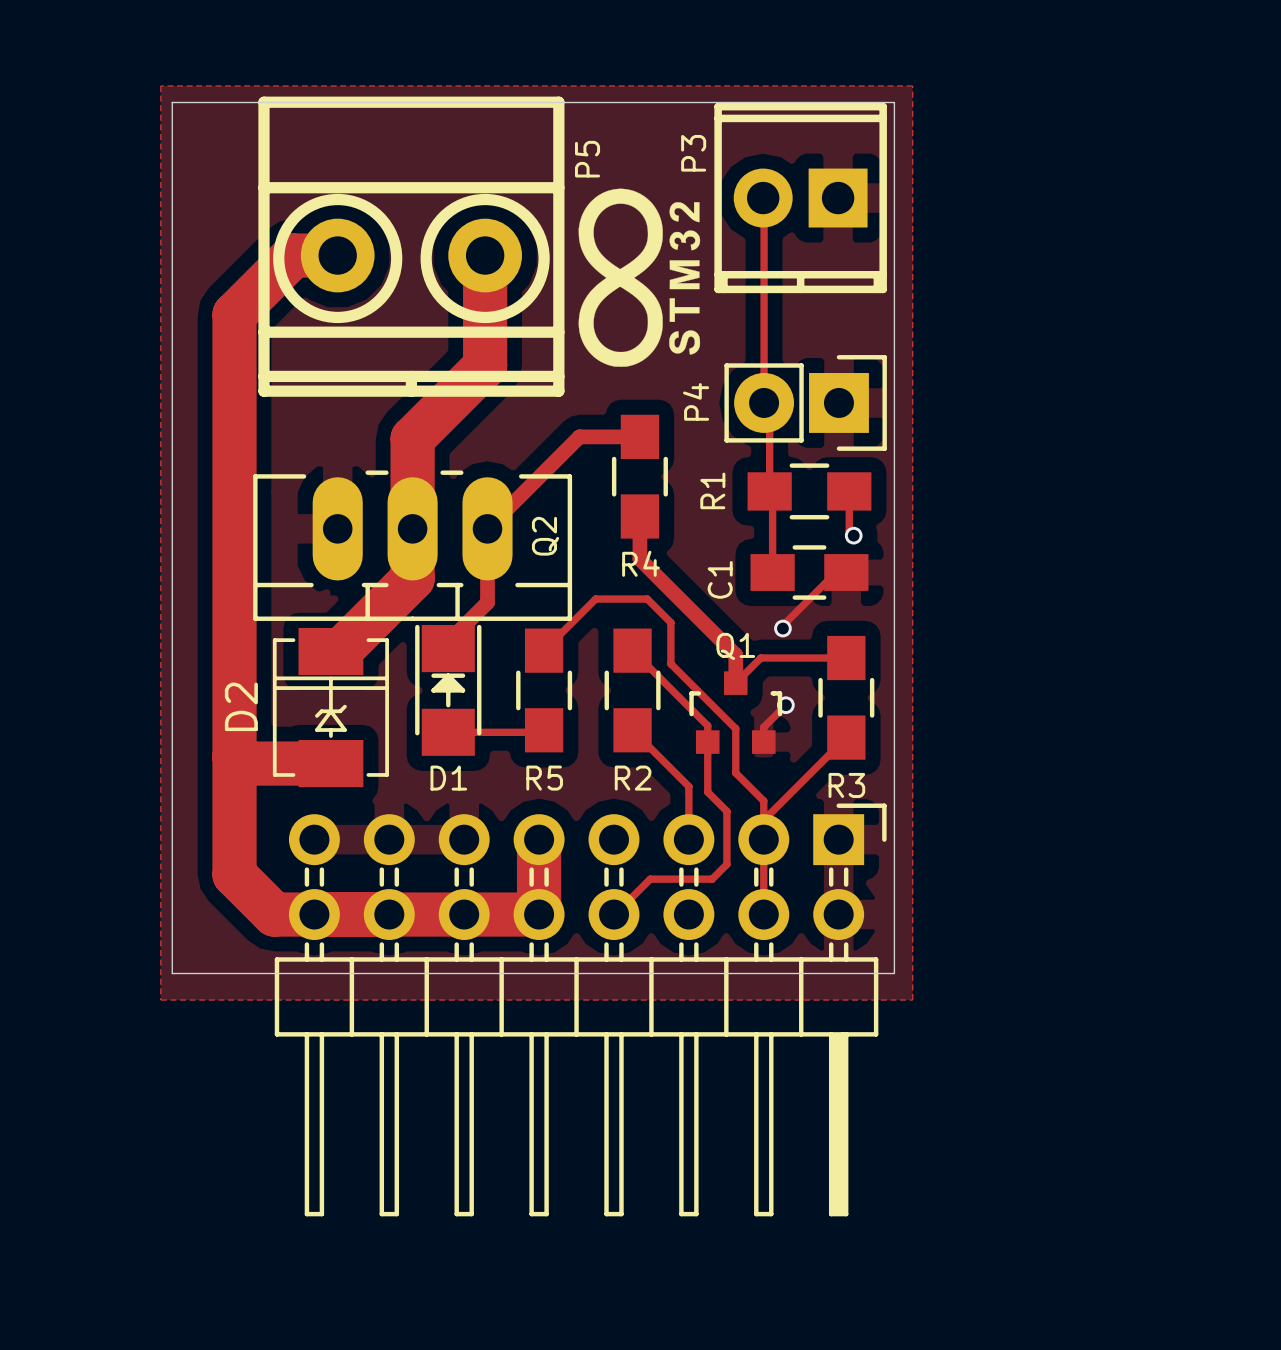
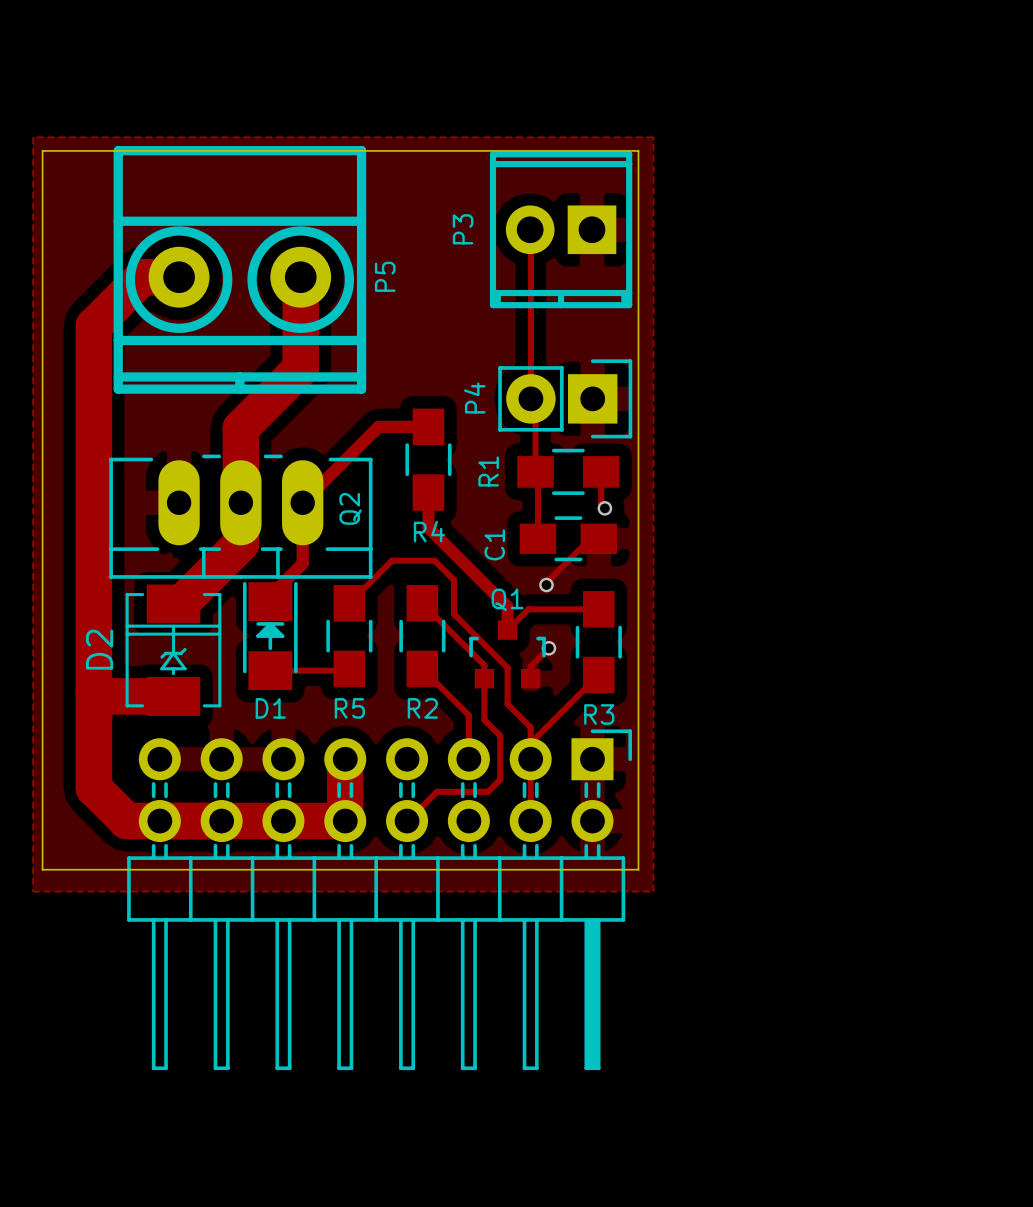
P3 name position: P3 (693, 153) -> P3 (463, 229)
P5 name position: P5 (587, 159) -> P5 (385, 276)
drawing: [578, 188, 701, 367] -> none

